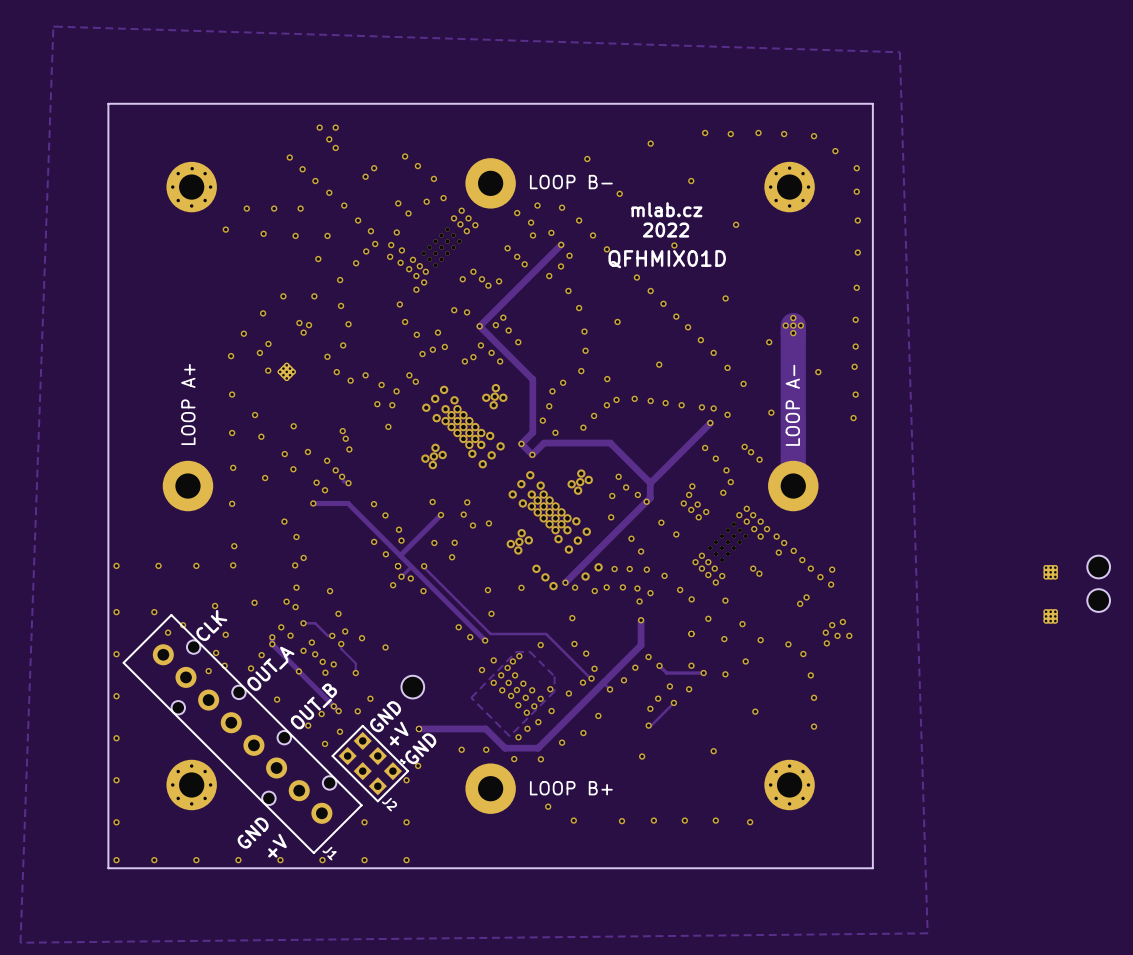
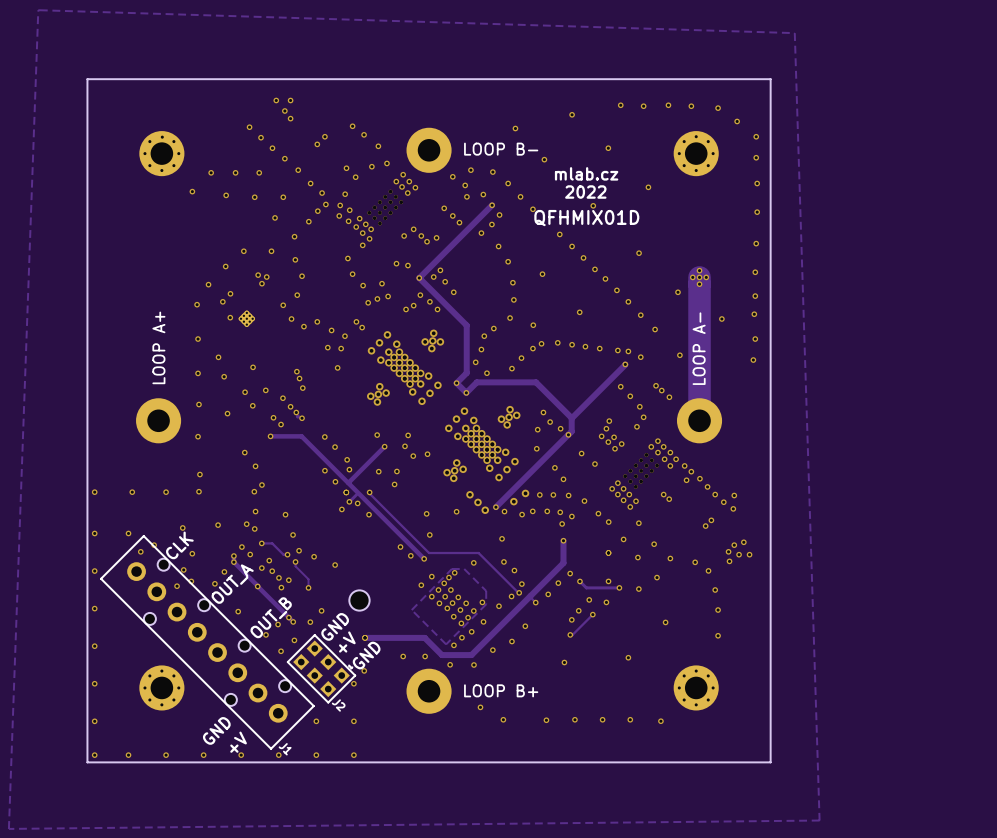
part: (1098, 567) -> none
part: (1050, 572) -> none
part: (1098, 600) -> none
part: (1050, 616) -> none

